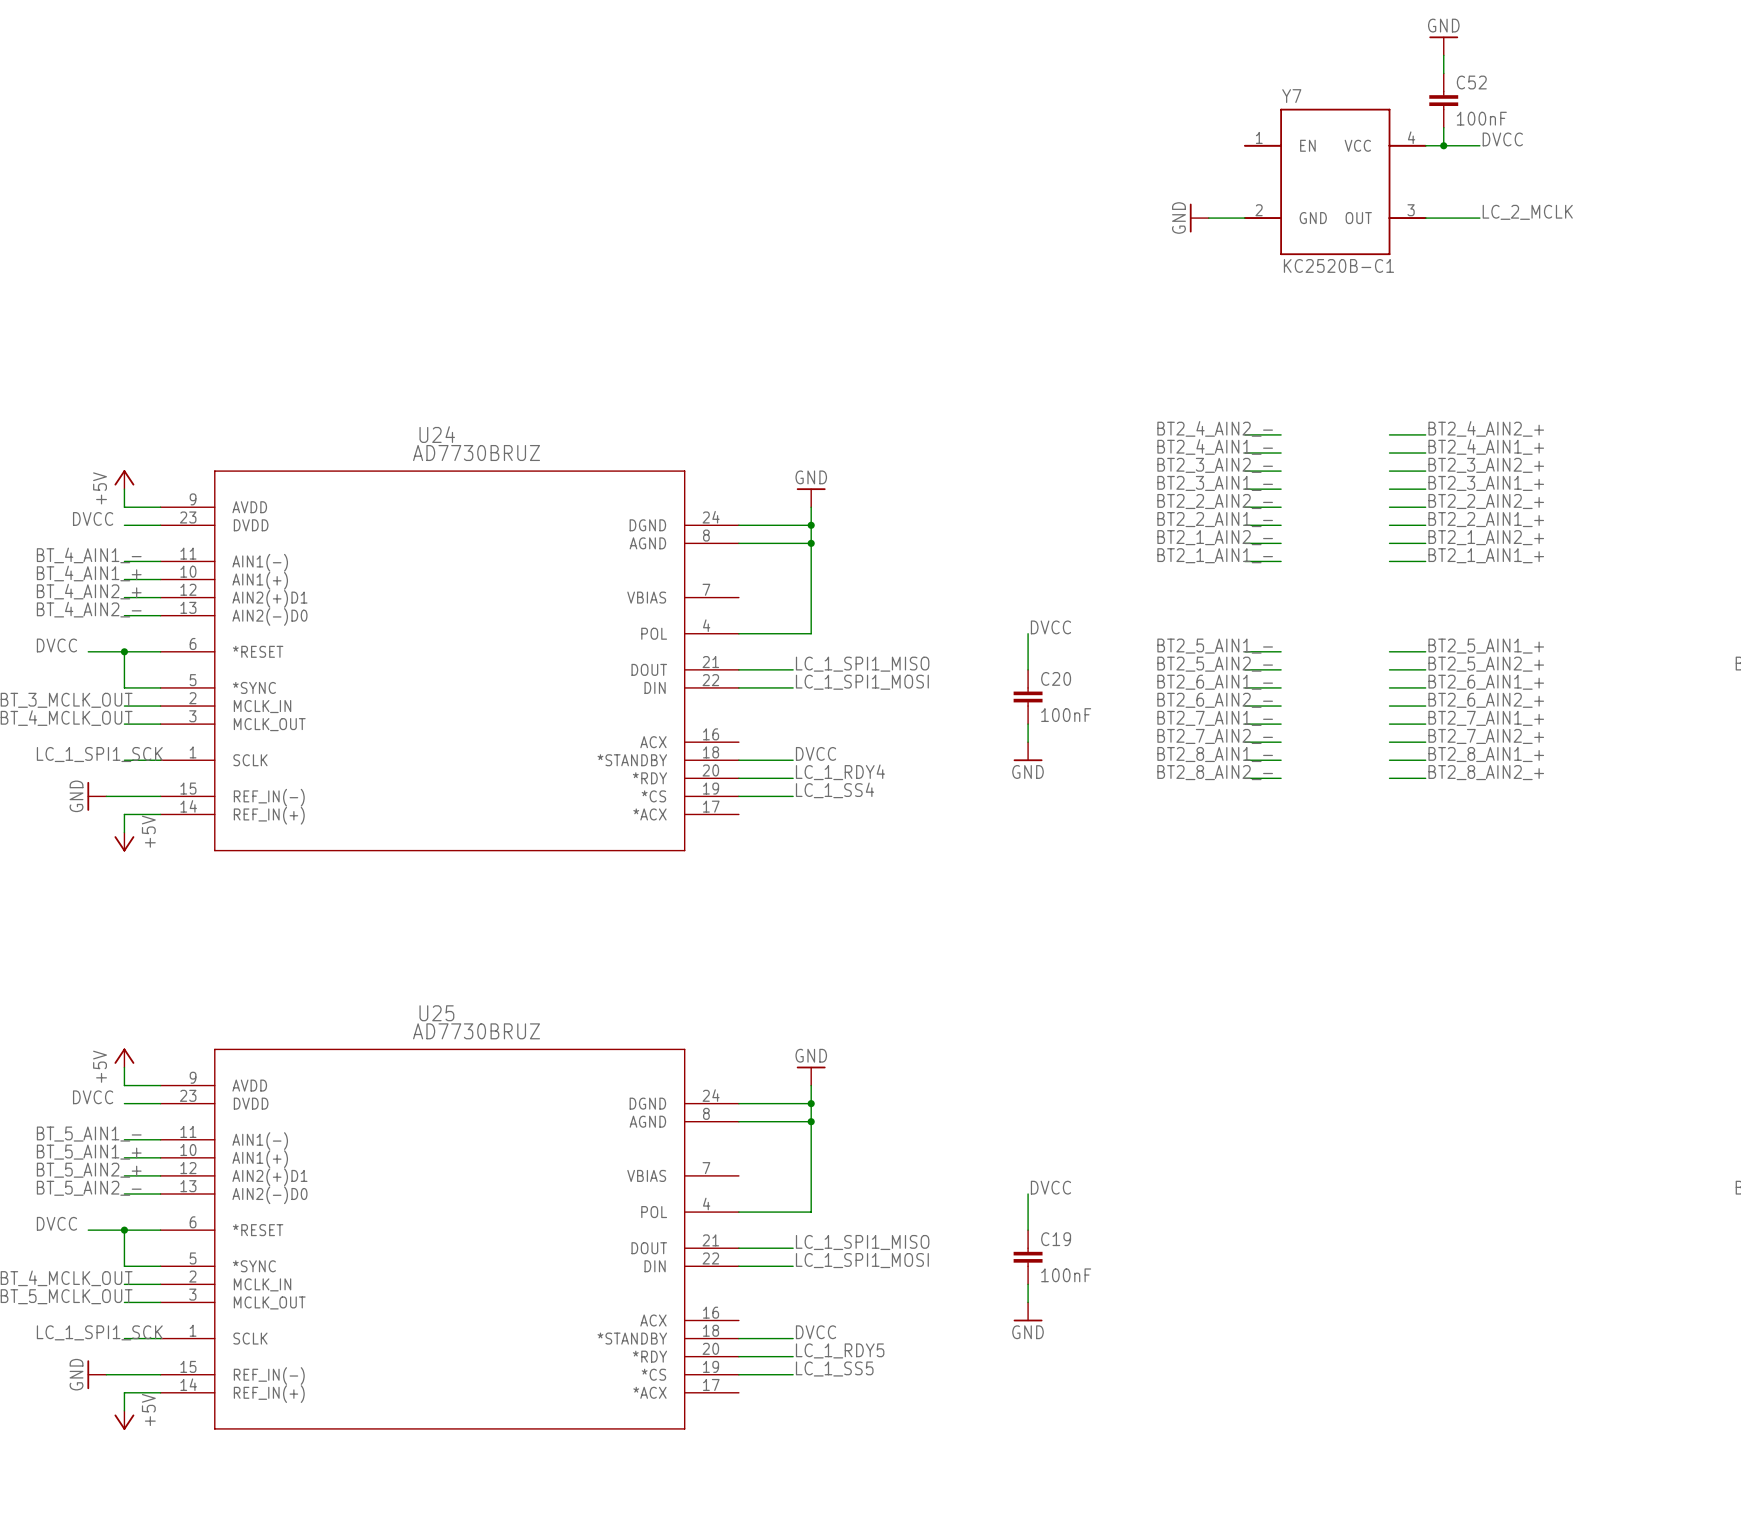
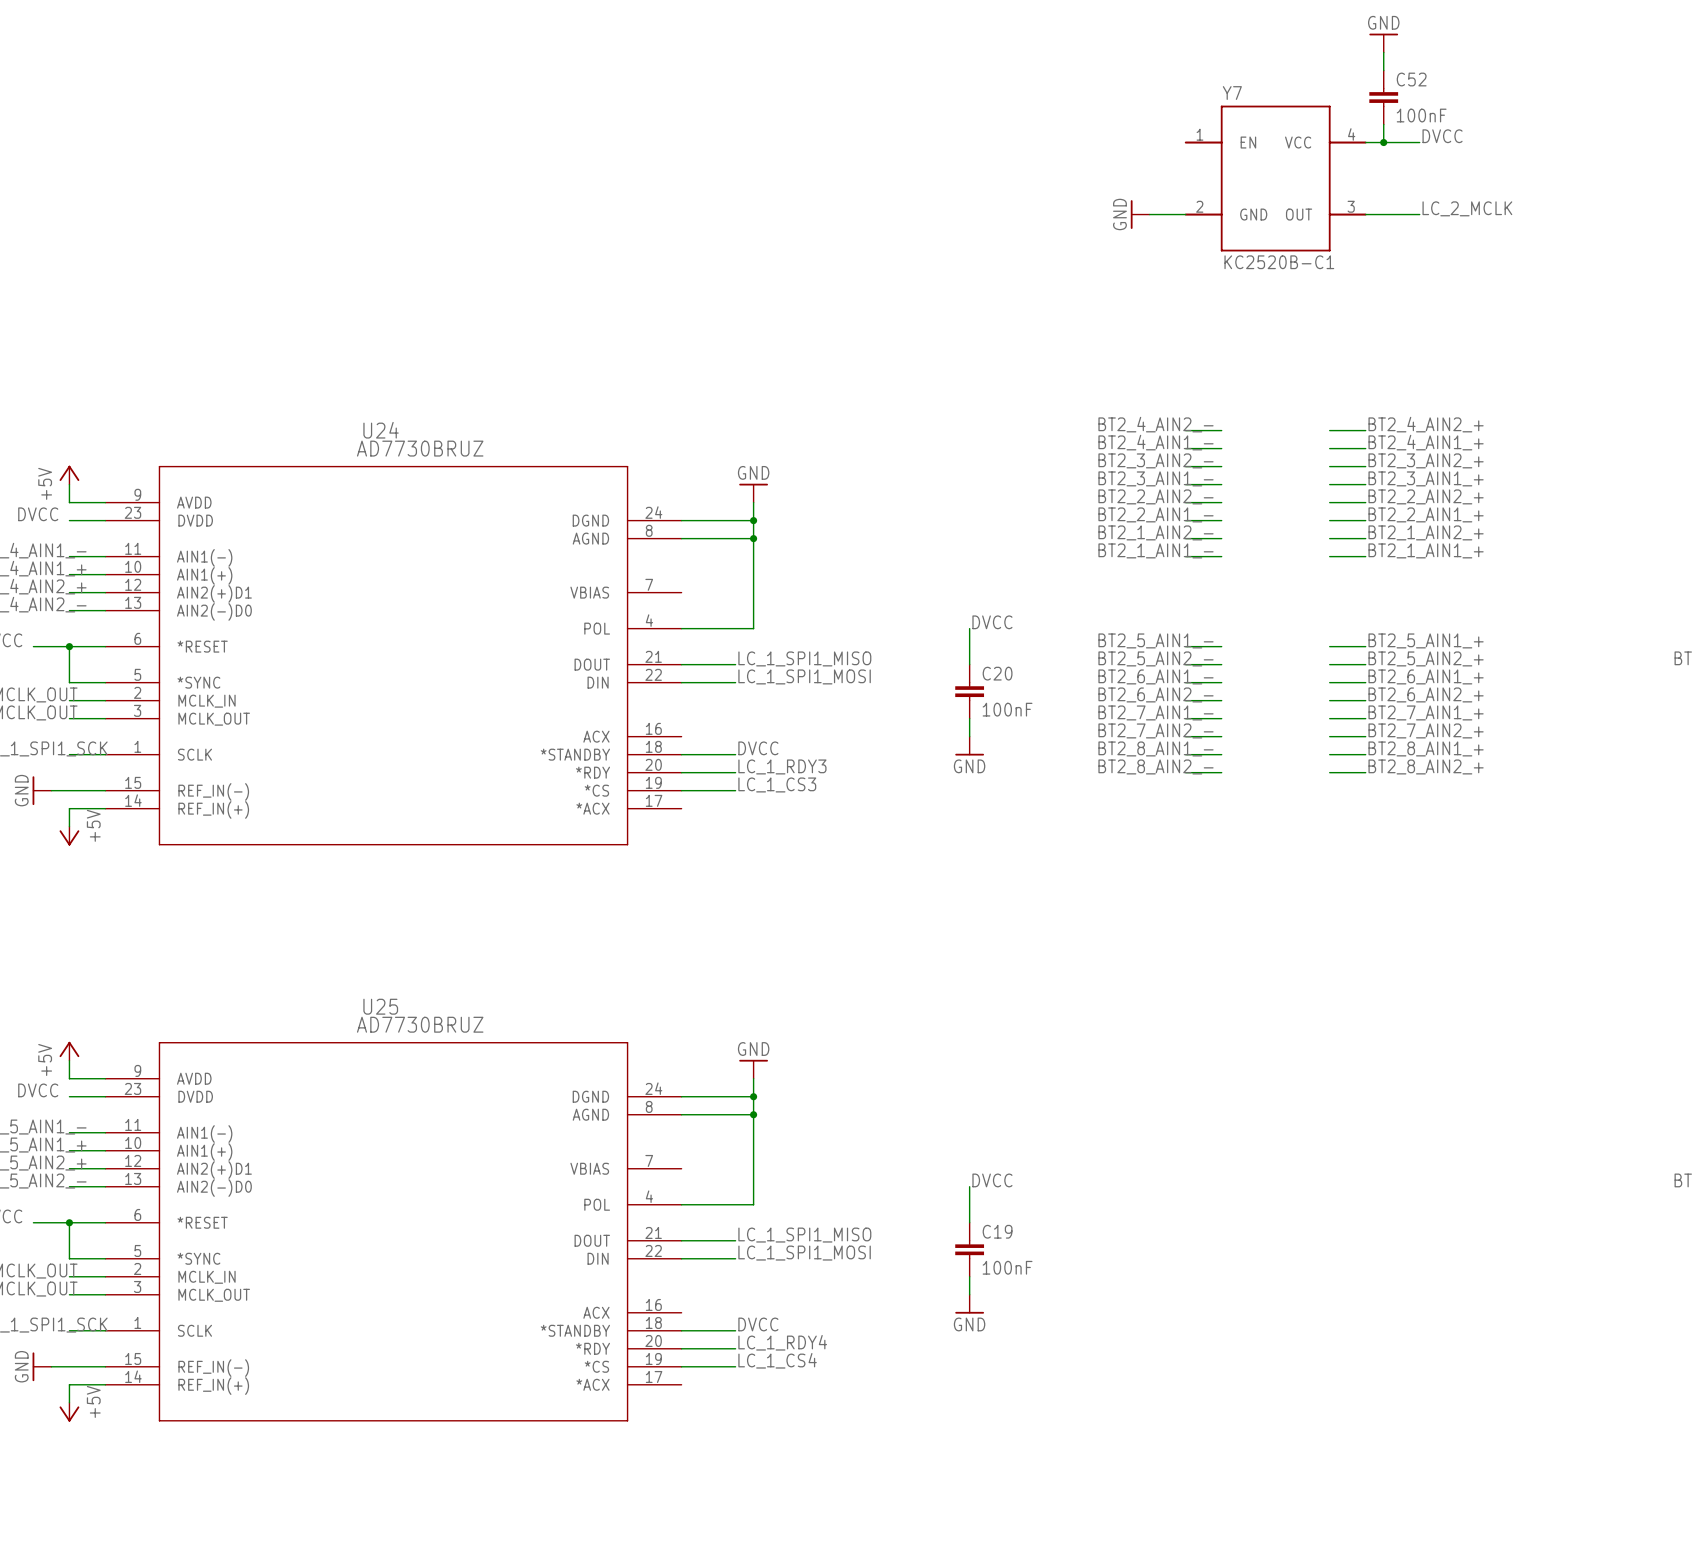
label: LC_1_RDY4 (840, 772) -> LC_1_RDY3 (782, 766)
label: LC_1_SS4 (834, 790) -> LC_1_CS3 (777, 784)
label: LC_1_RDY5 (840, 1350) -> LC_1_RDY4 (782, 1342)
label: LC_1_SS5 (834, 1369) -> LC_1_CS4 (777, 1360)

